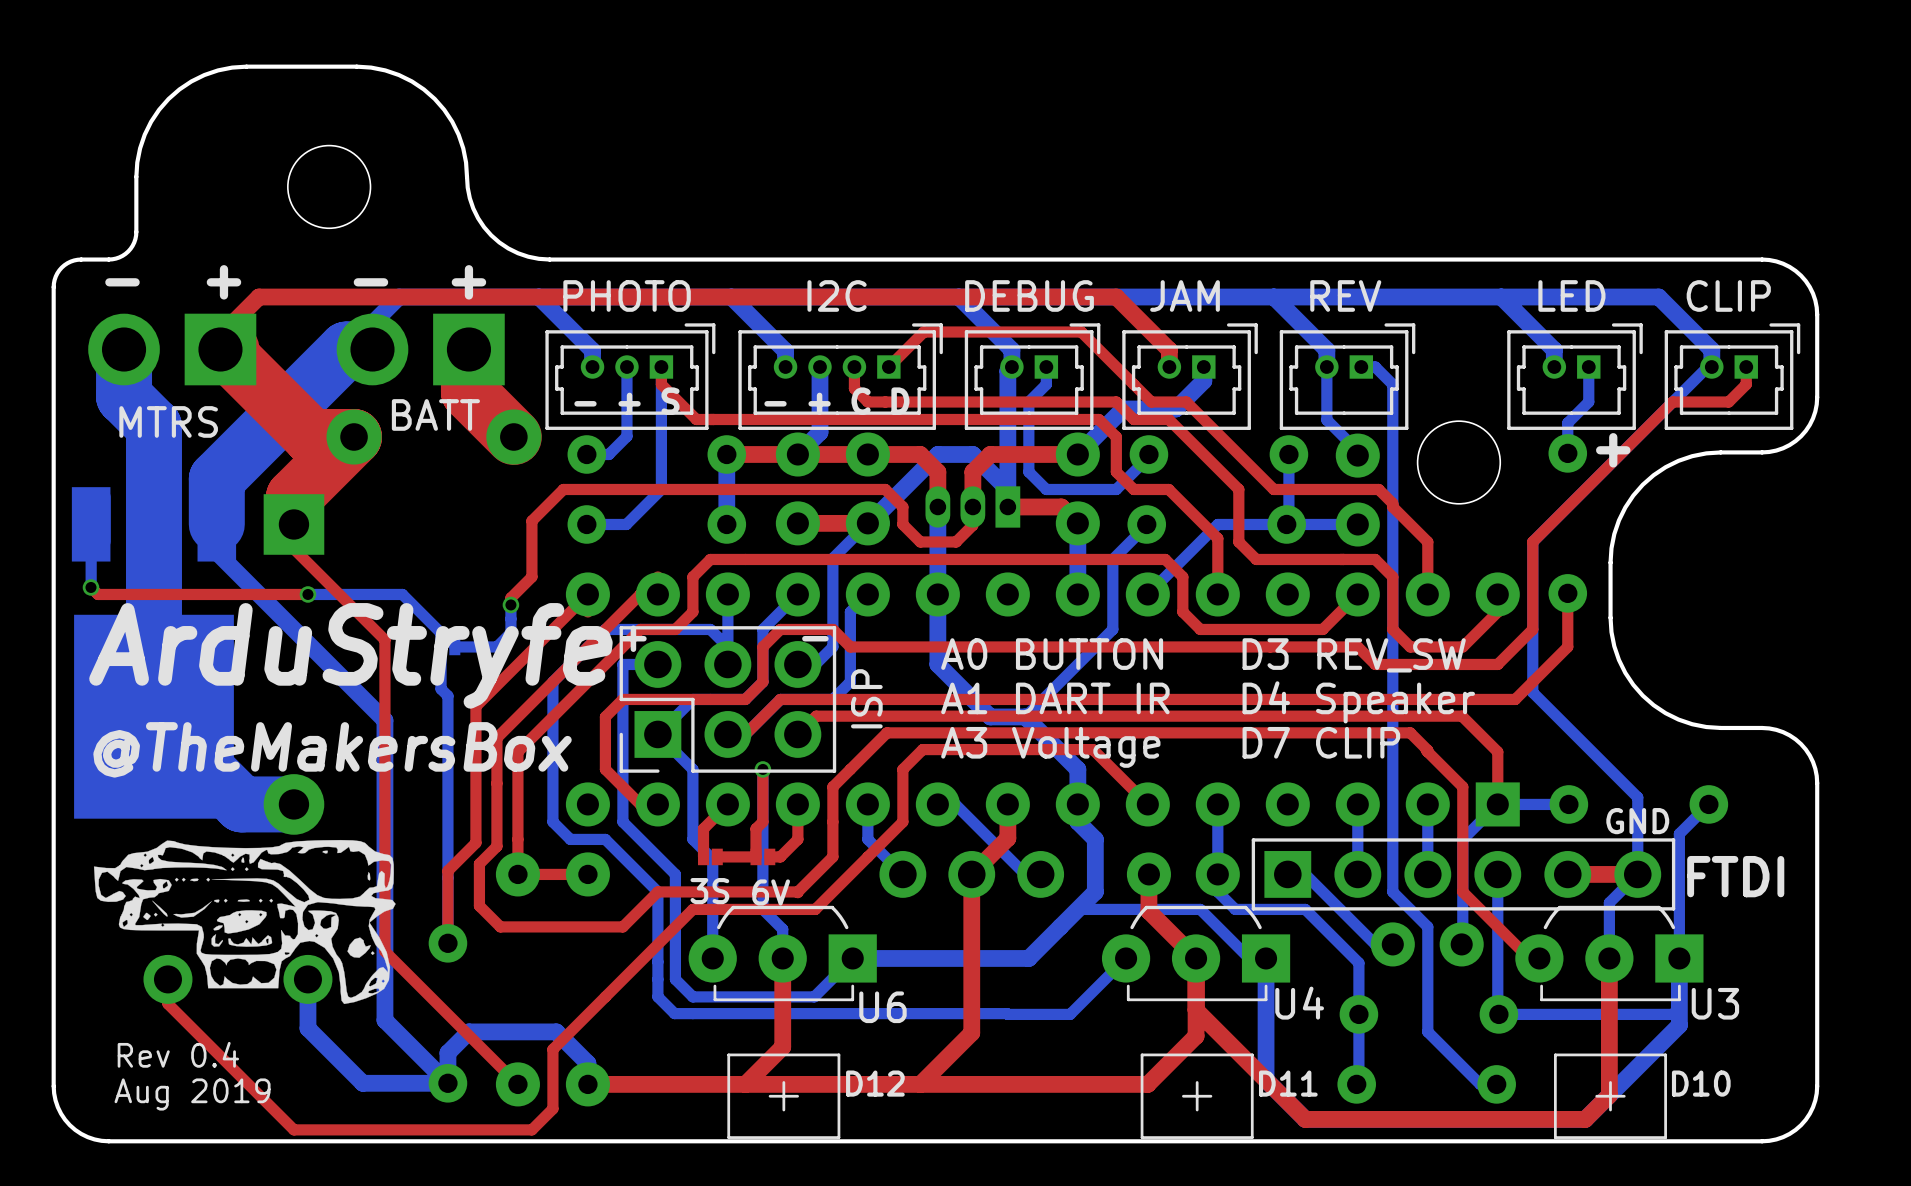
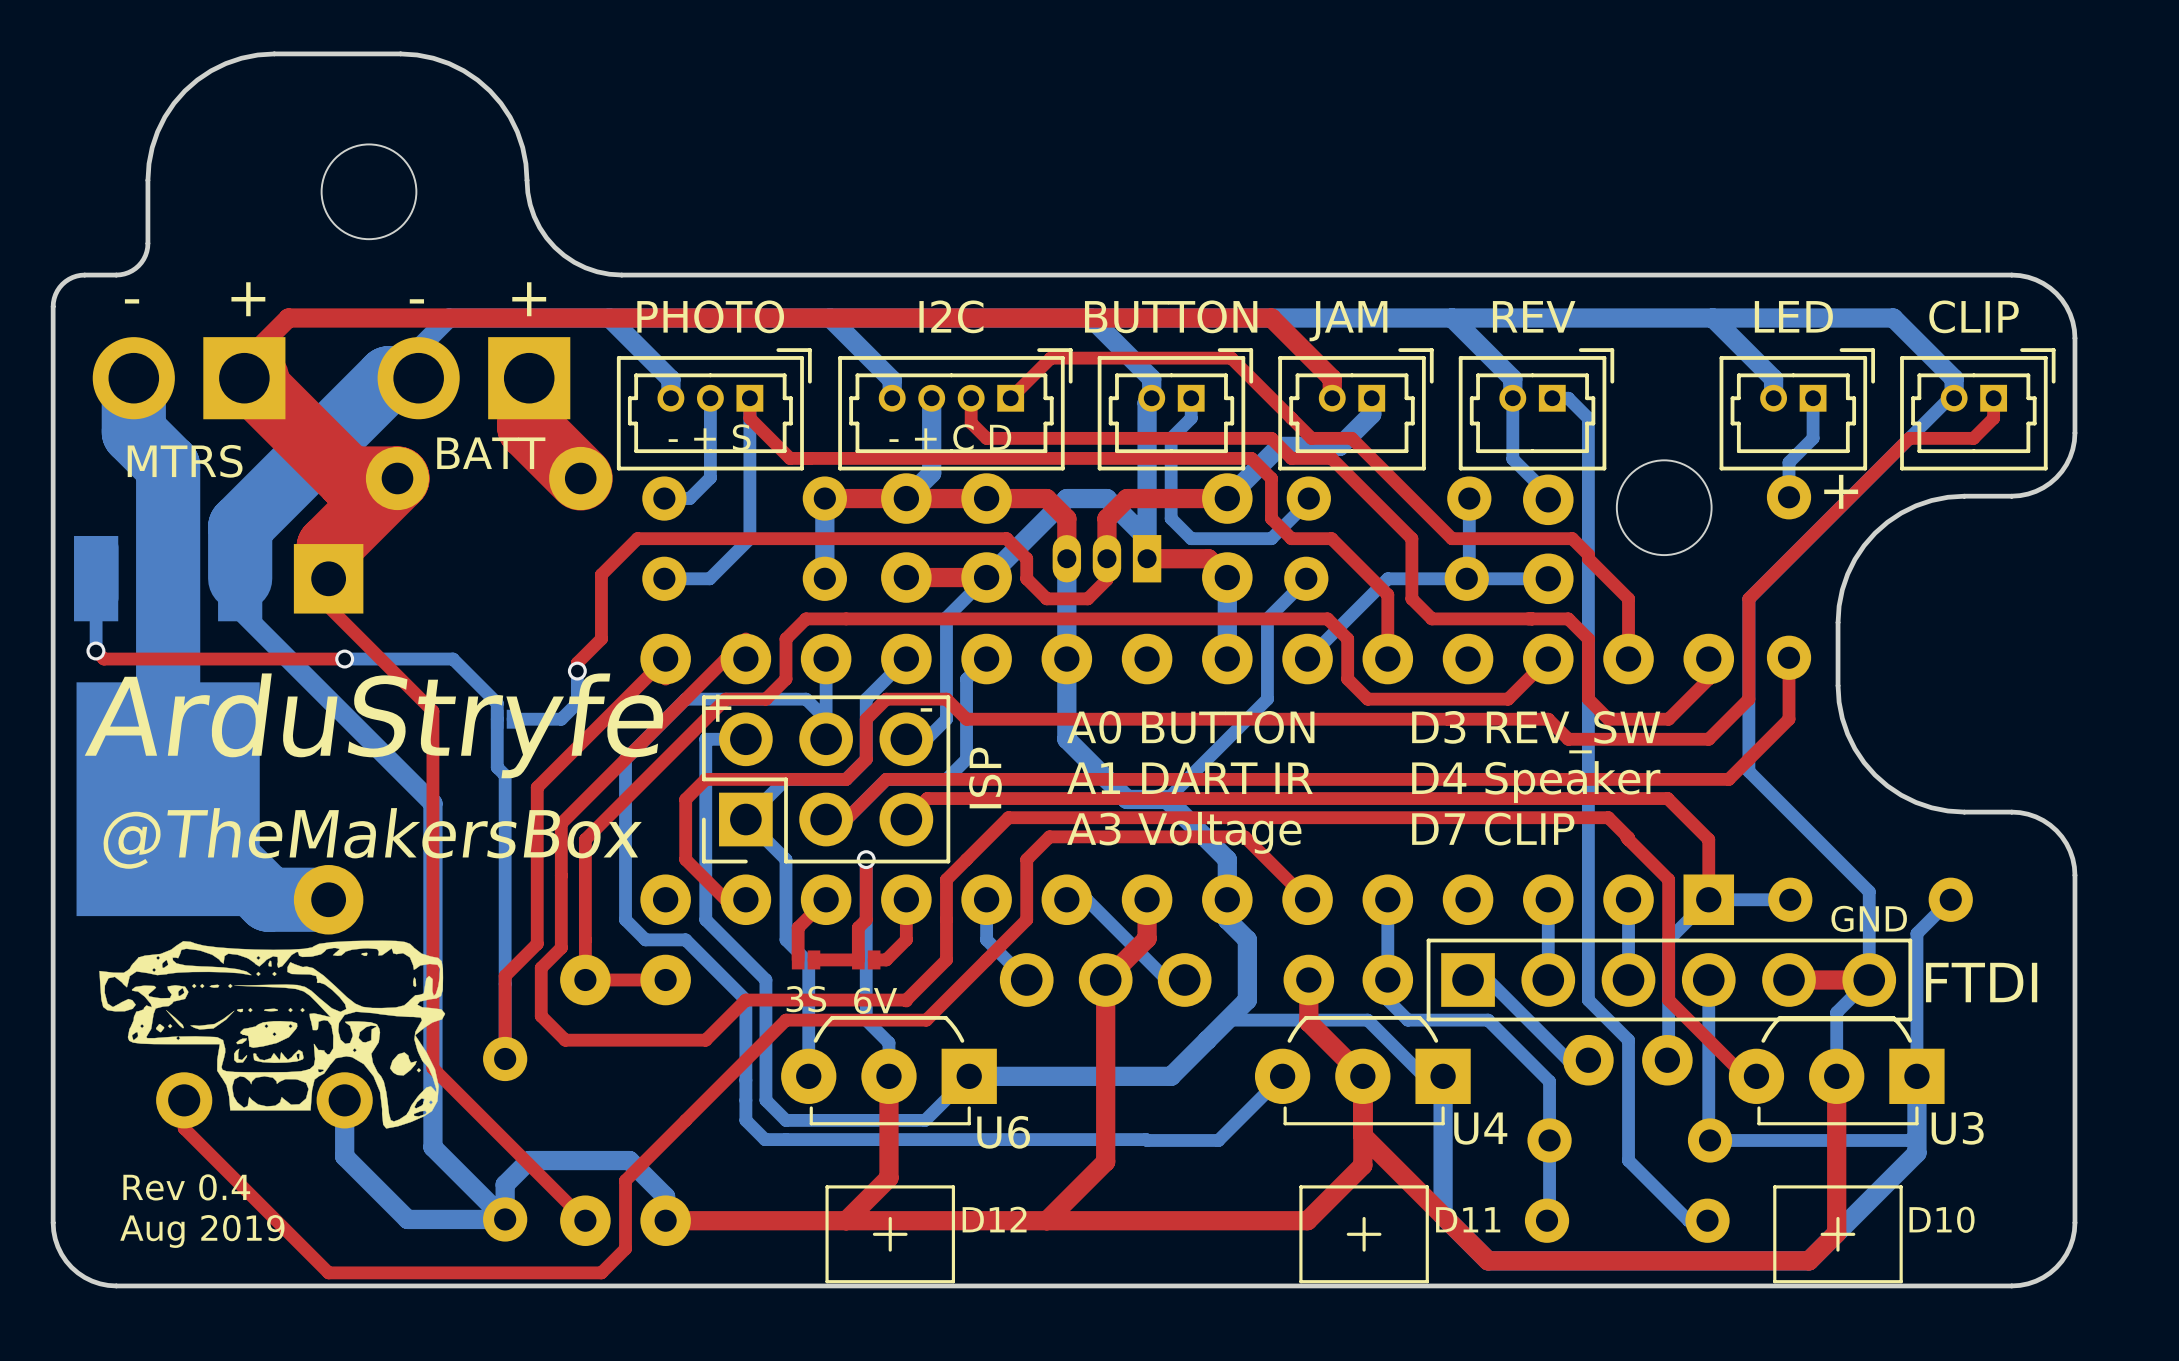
part value: DEBUG (1029, 295) -> BUTTON (1171, 316)

